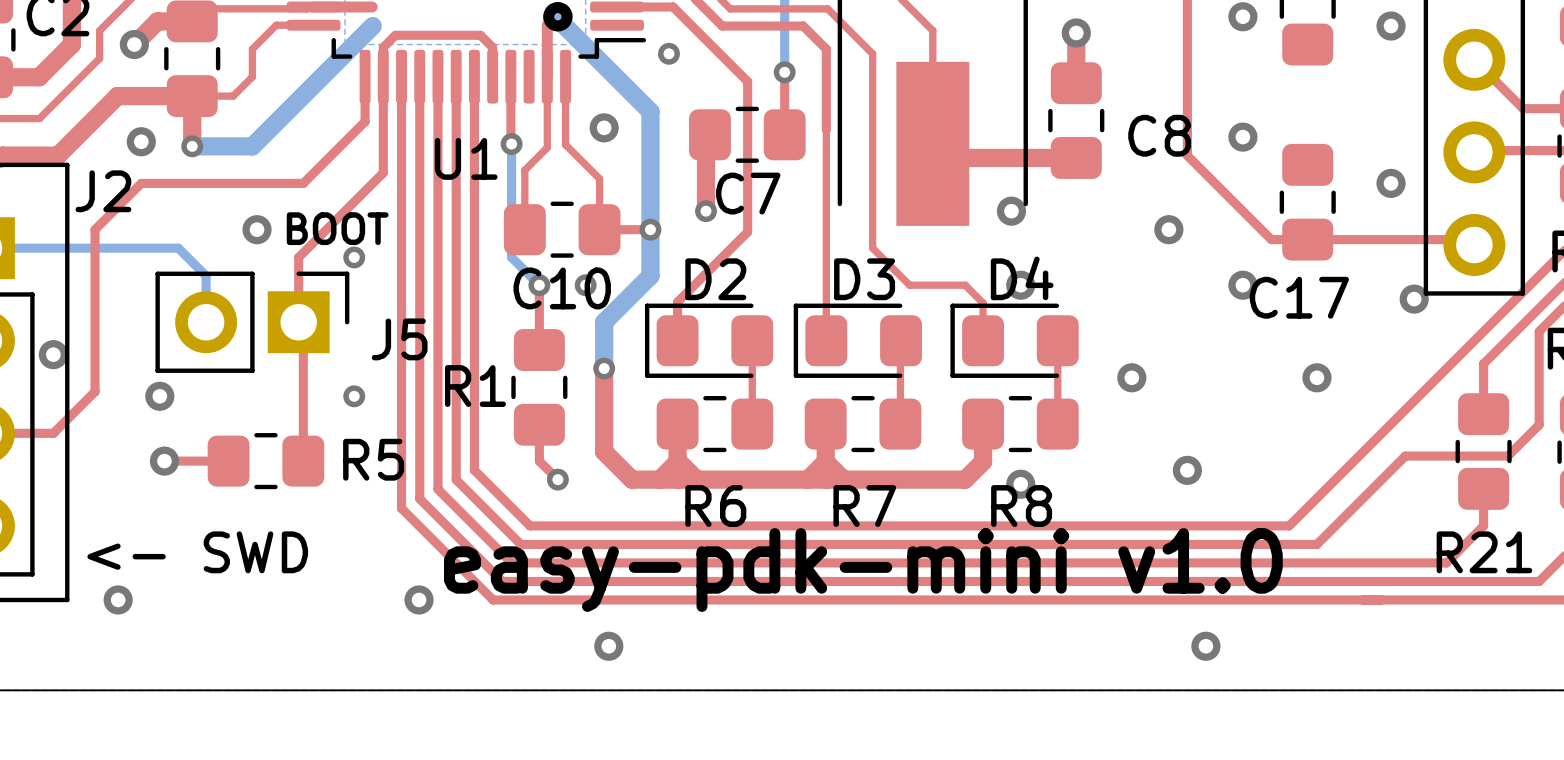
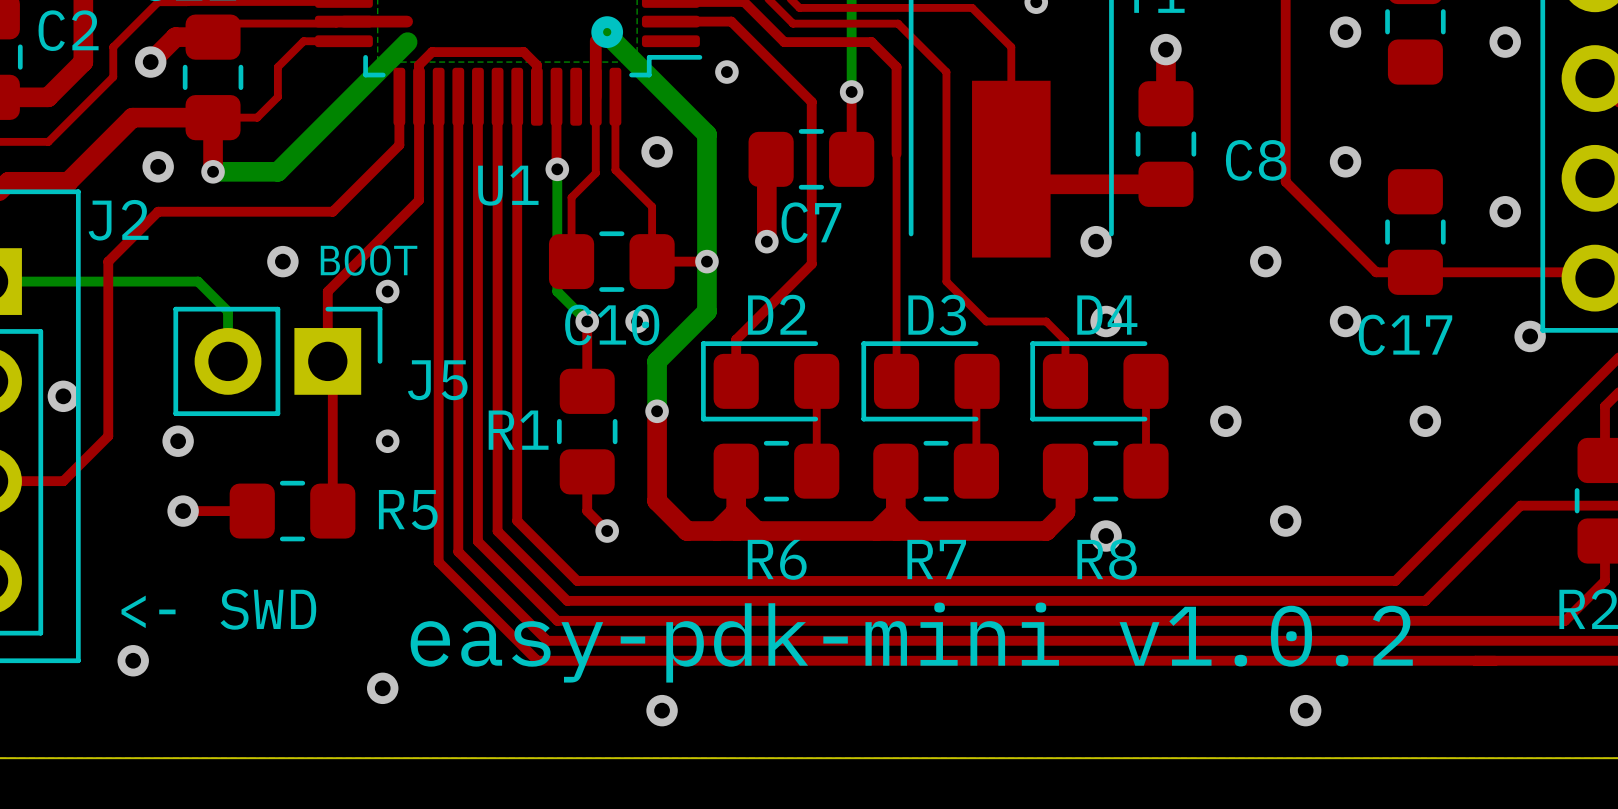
text: easy-pdk-mini v1.0 (863, 570) -> easy-pdk-mini v1.0.2 (911, 642)
via position: (419, 599) -> (382, 688)

